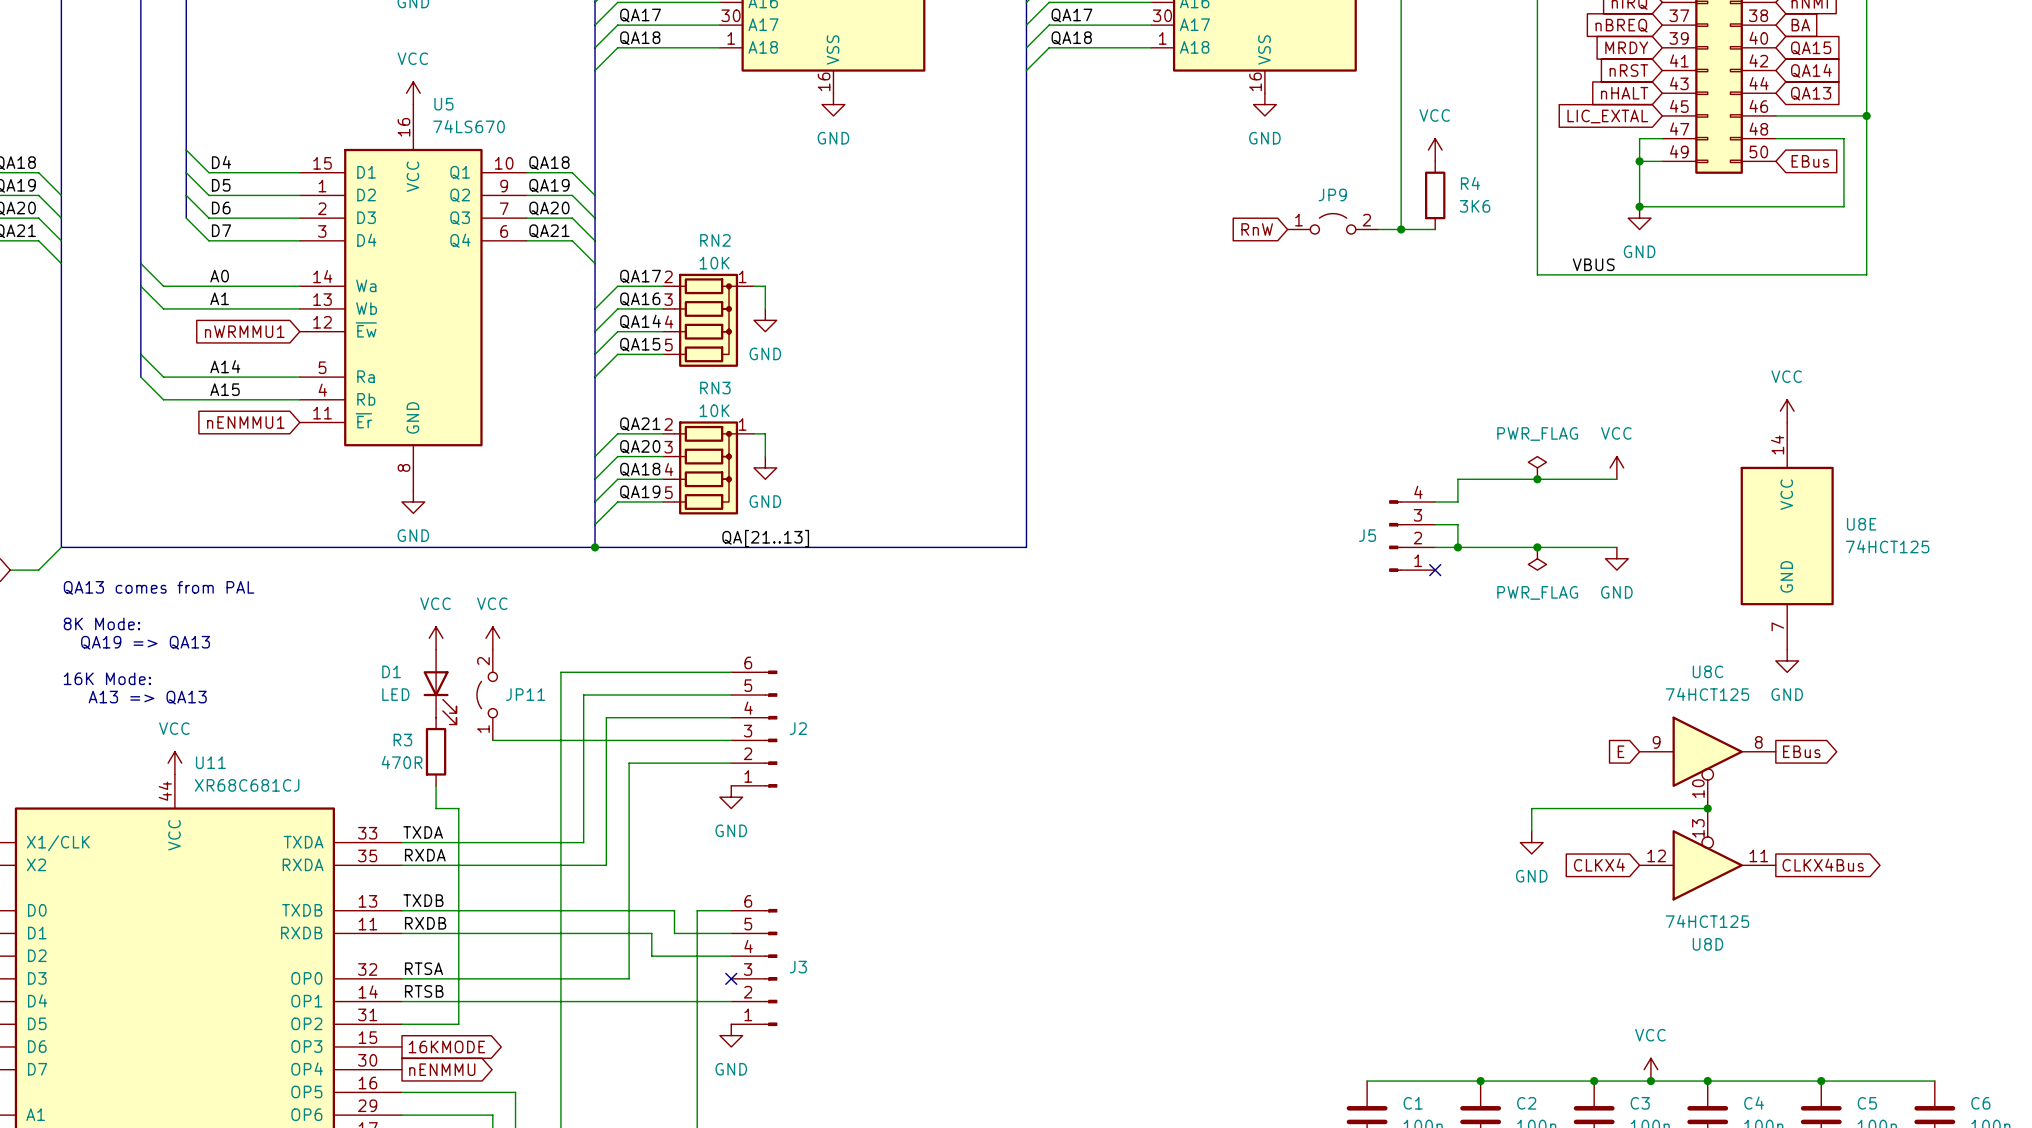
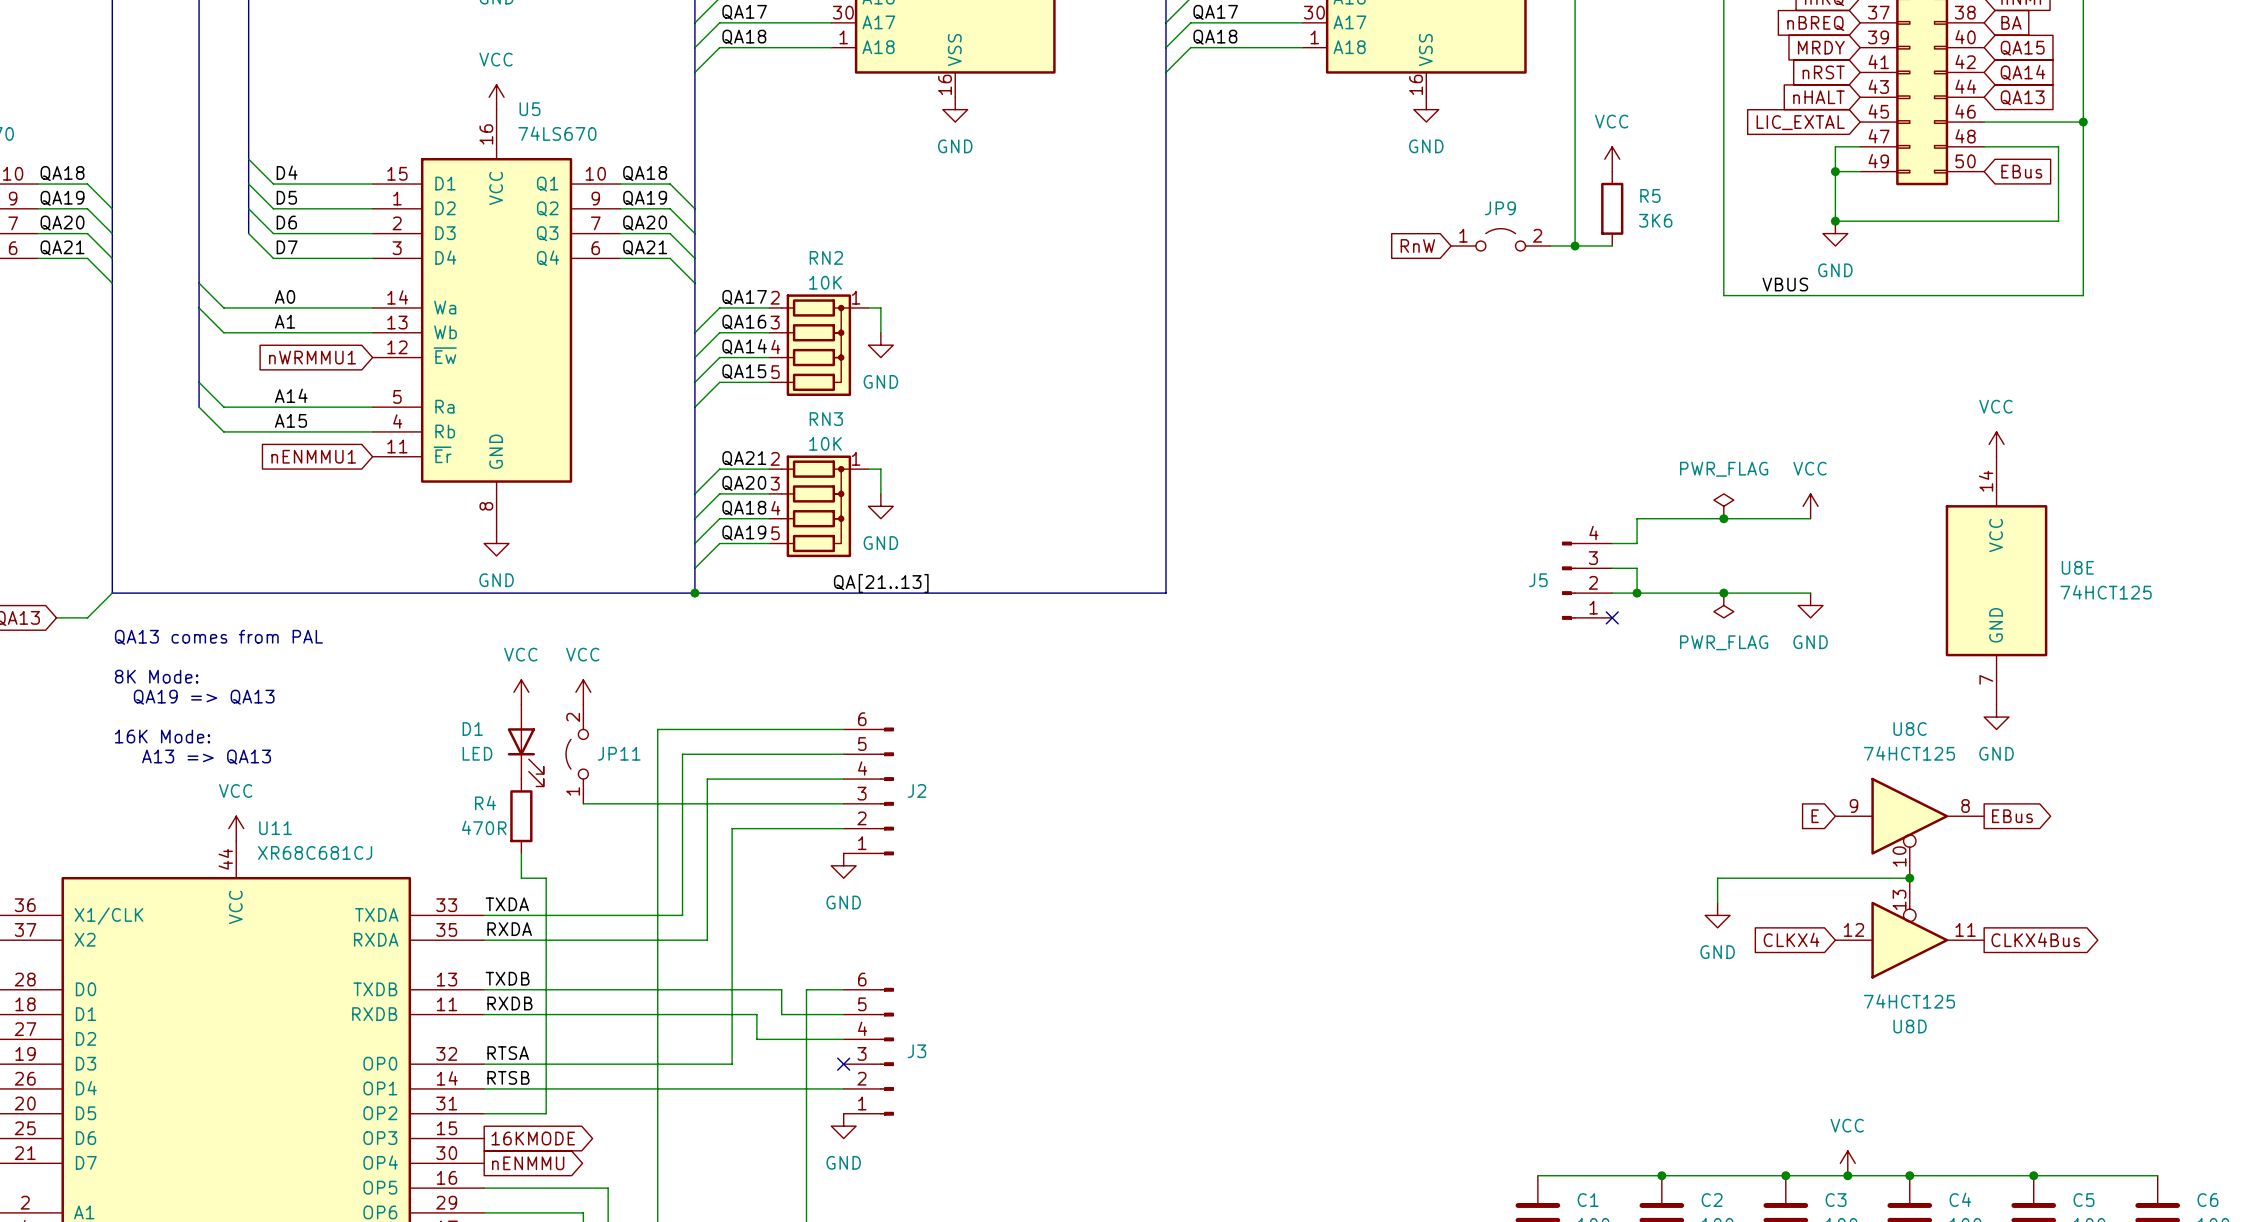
R4 name: R4 (1470, 183) -> R5 (1650, 195)
R3 name: R3 (402, 740) -> R4 (485, 803)

